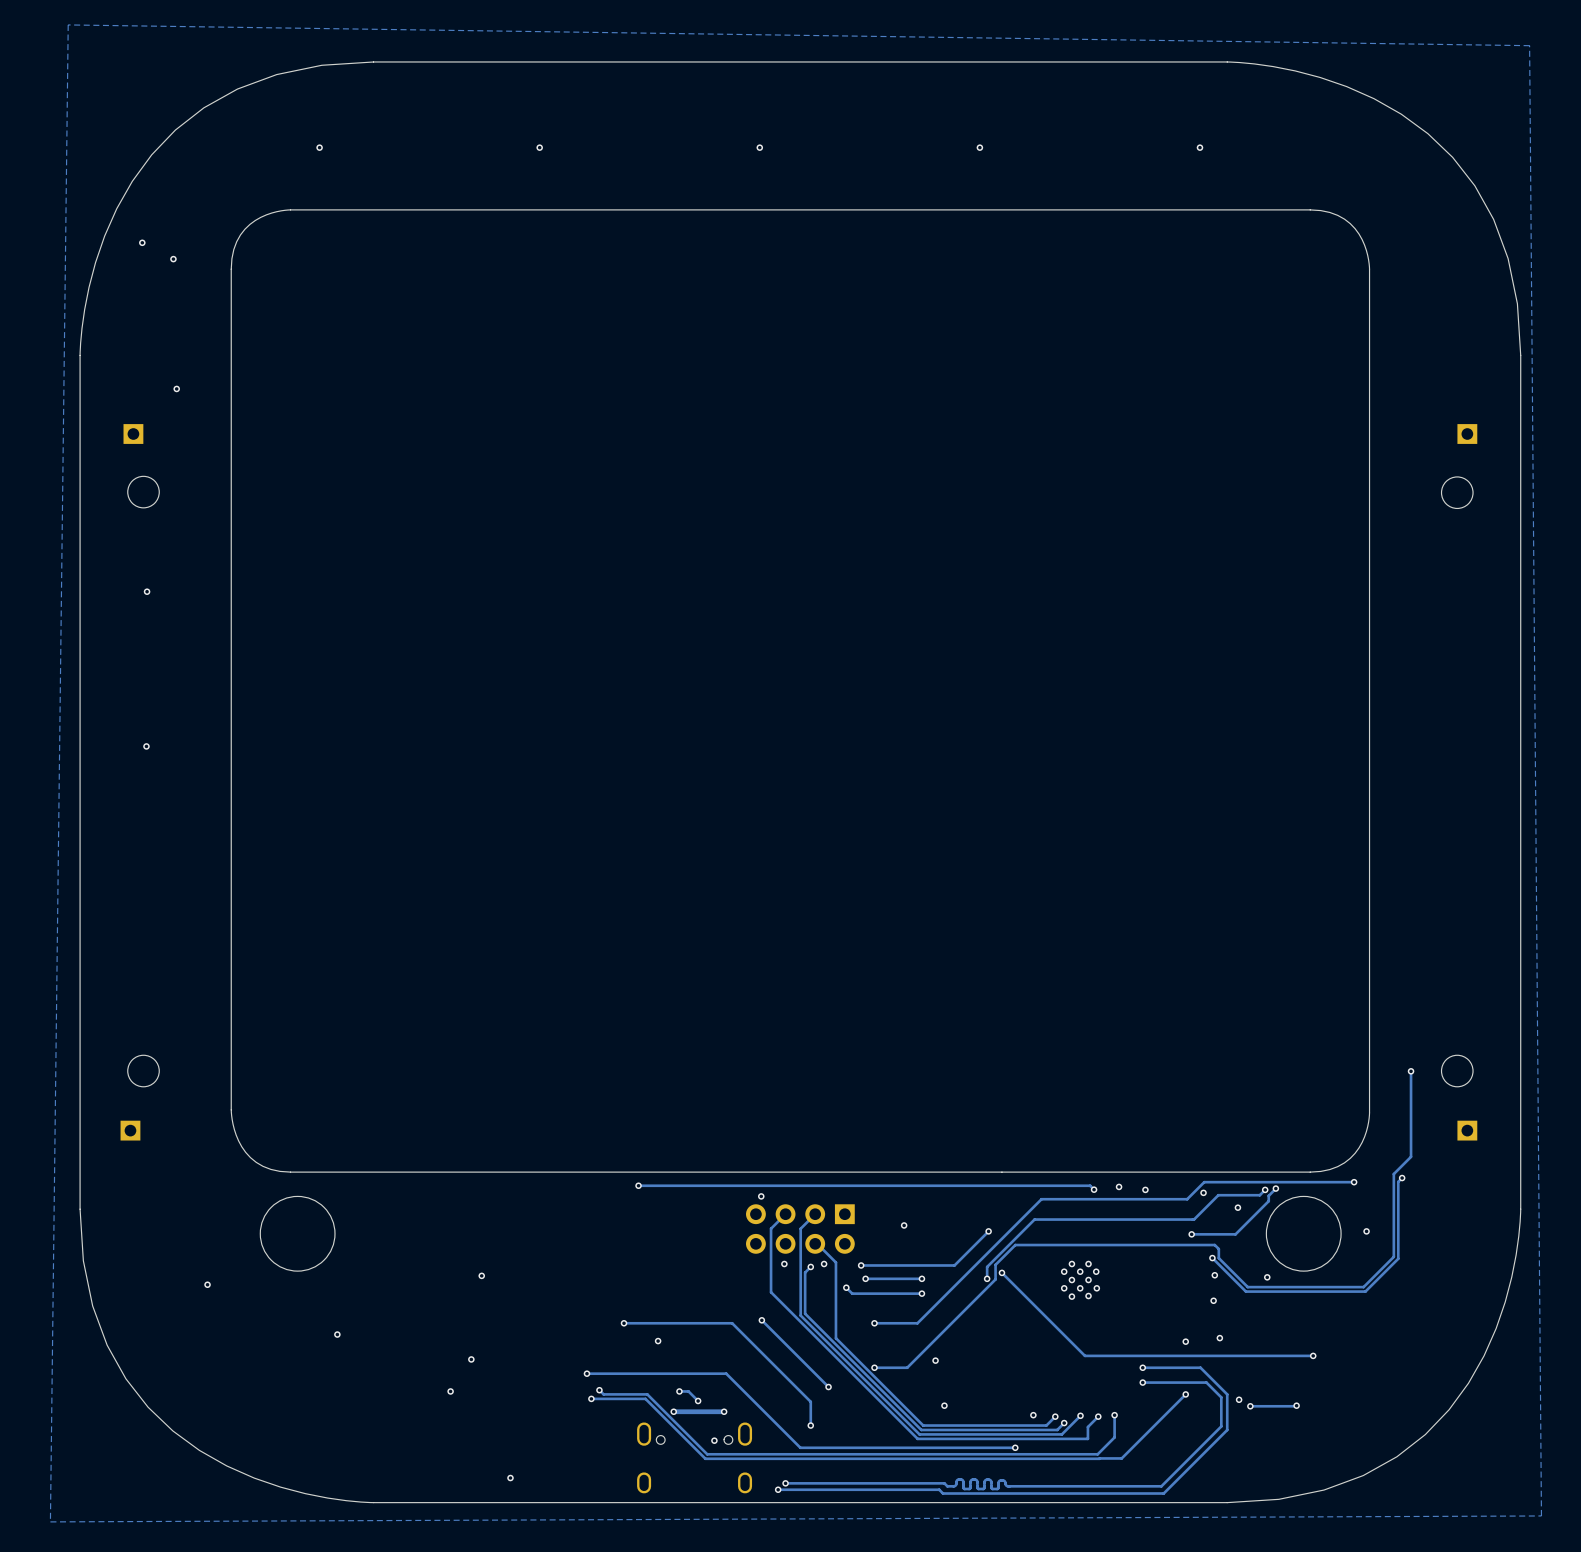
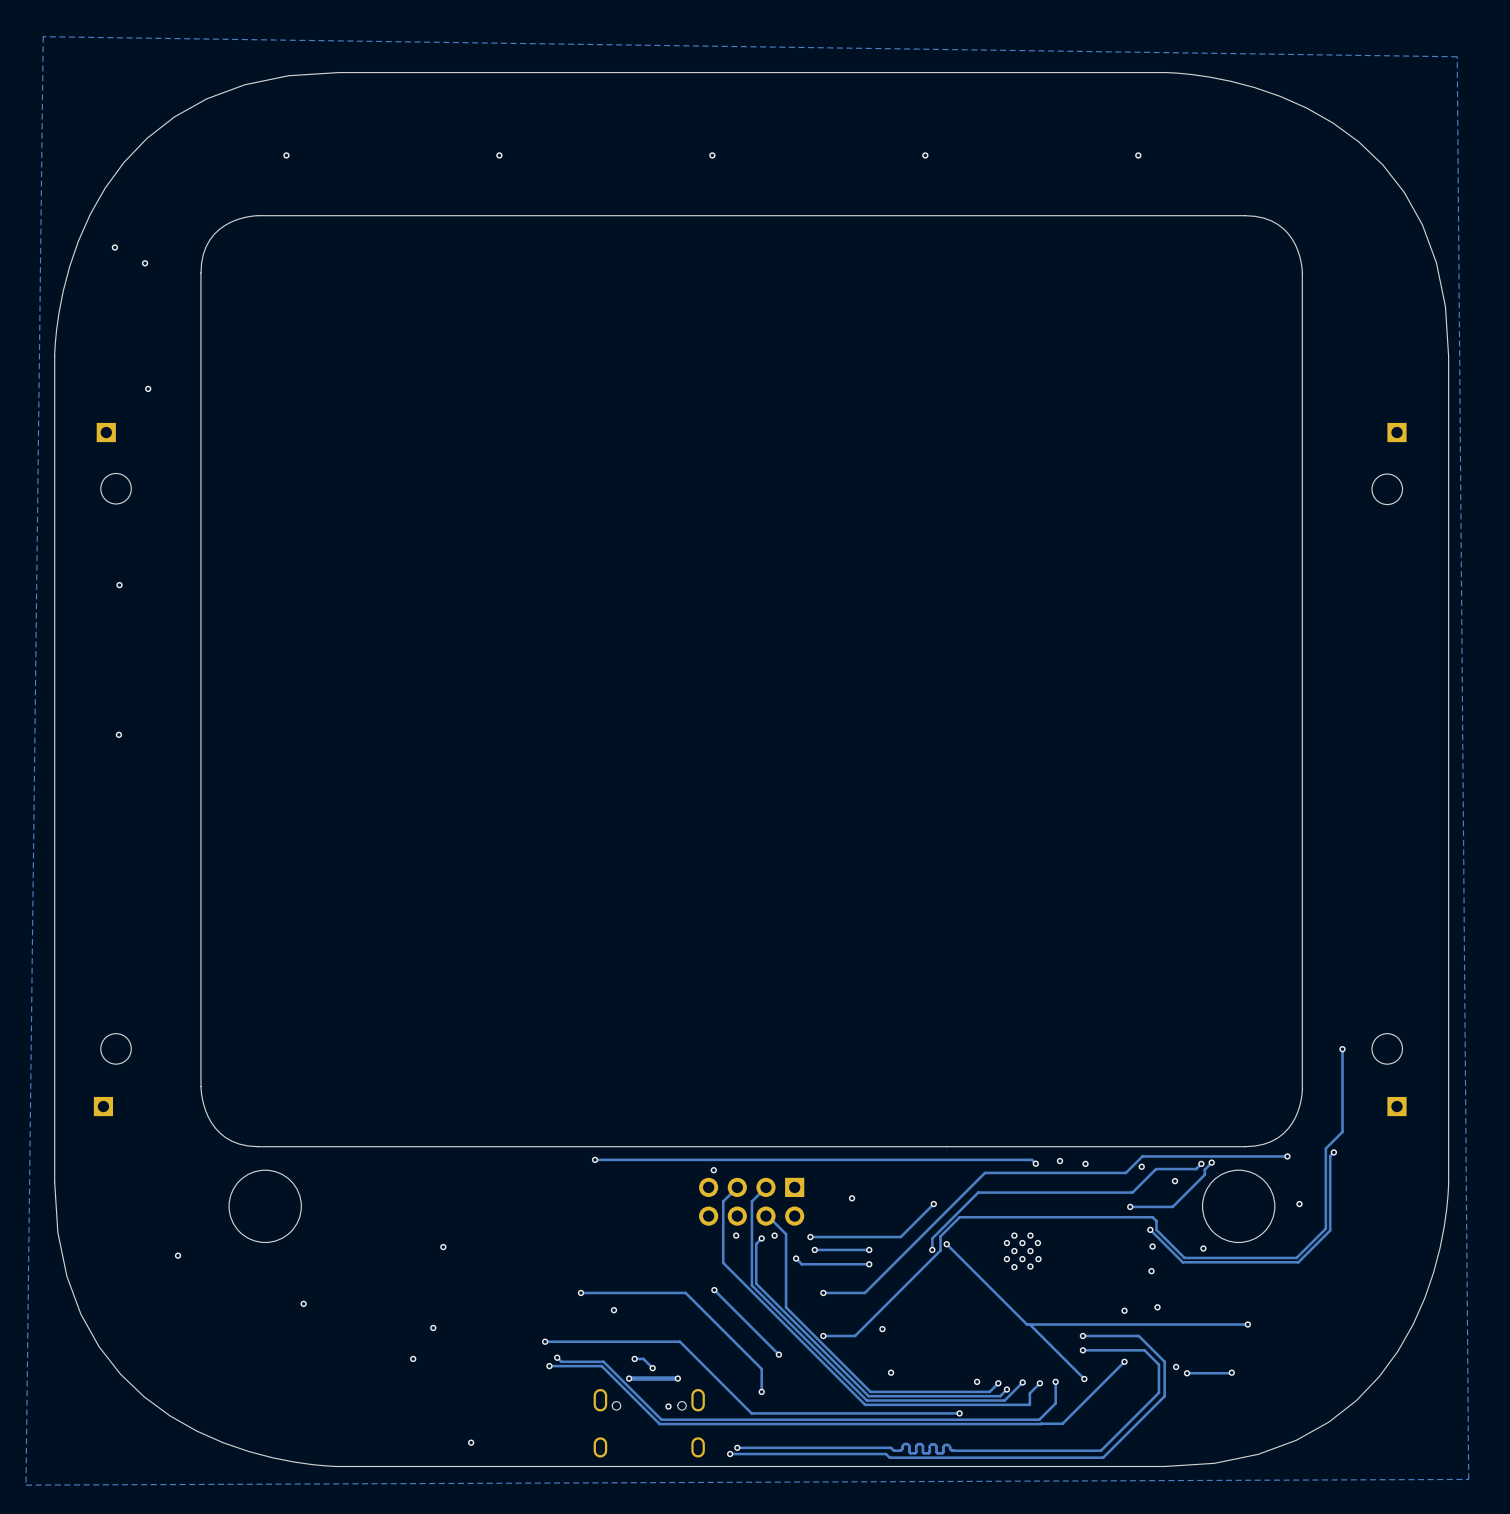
track: none -> (1027, 1324) (1029, 1324) (1084, 1379)
via: none -> (1084, 1379)

